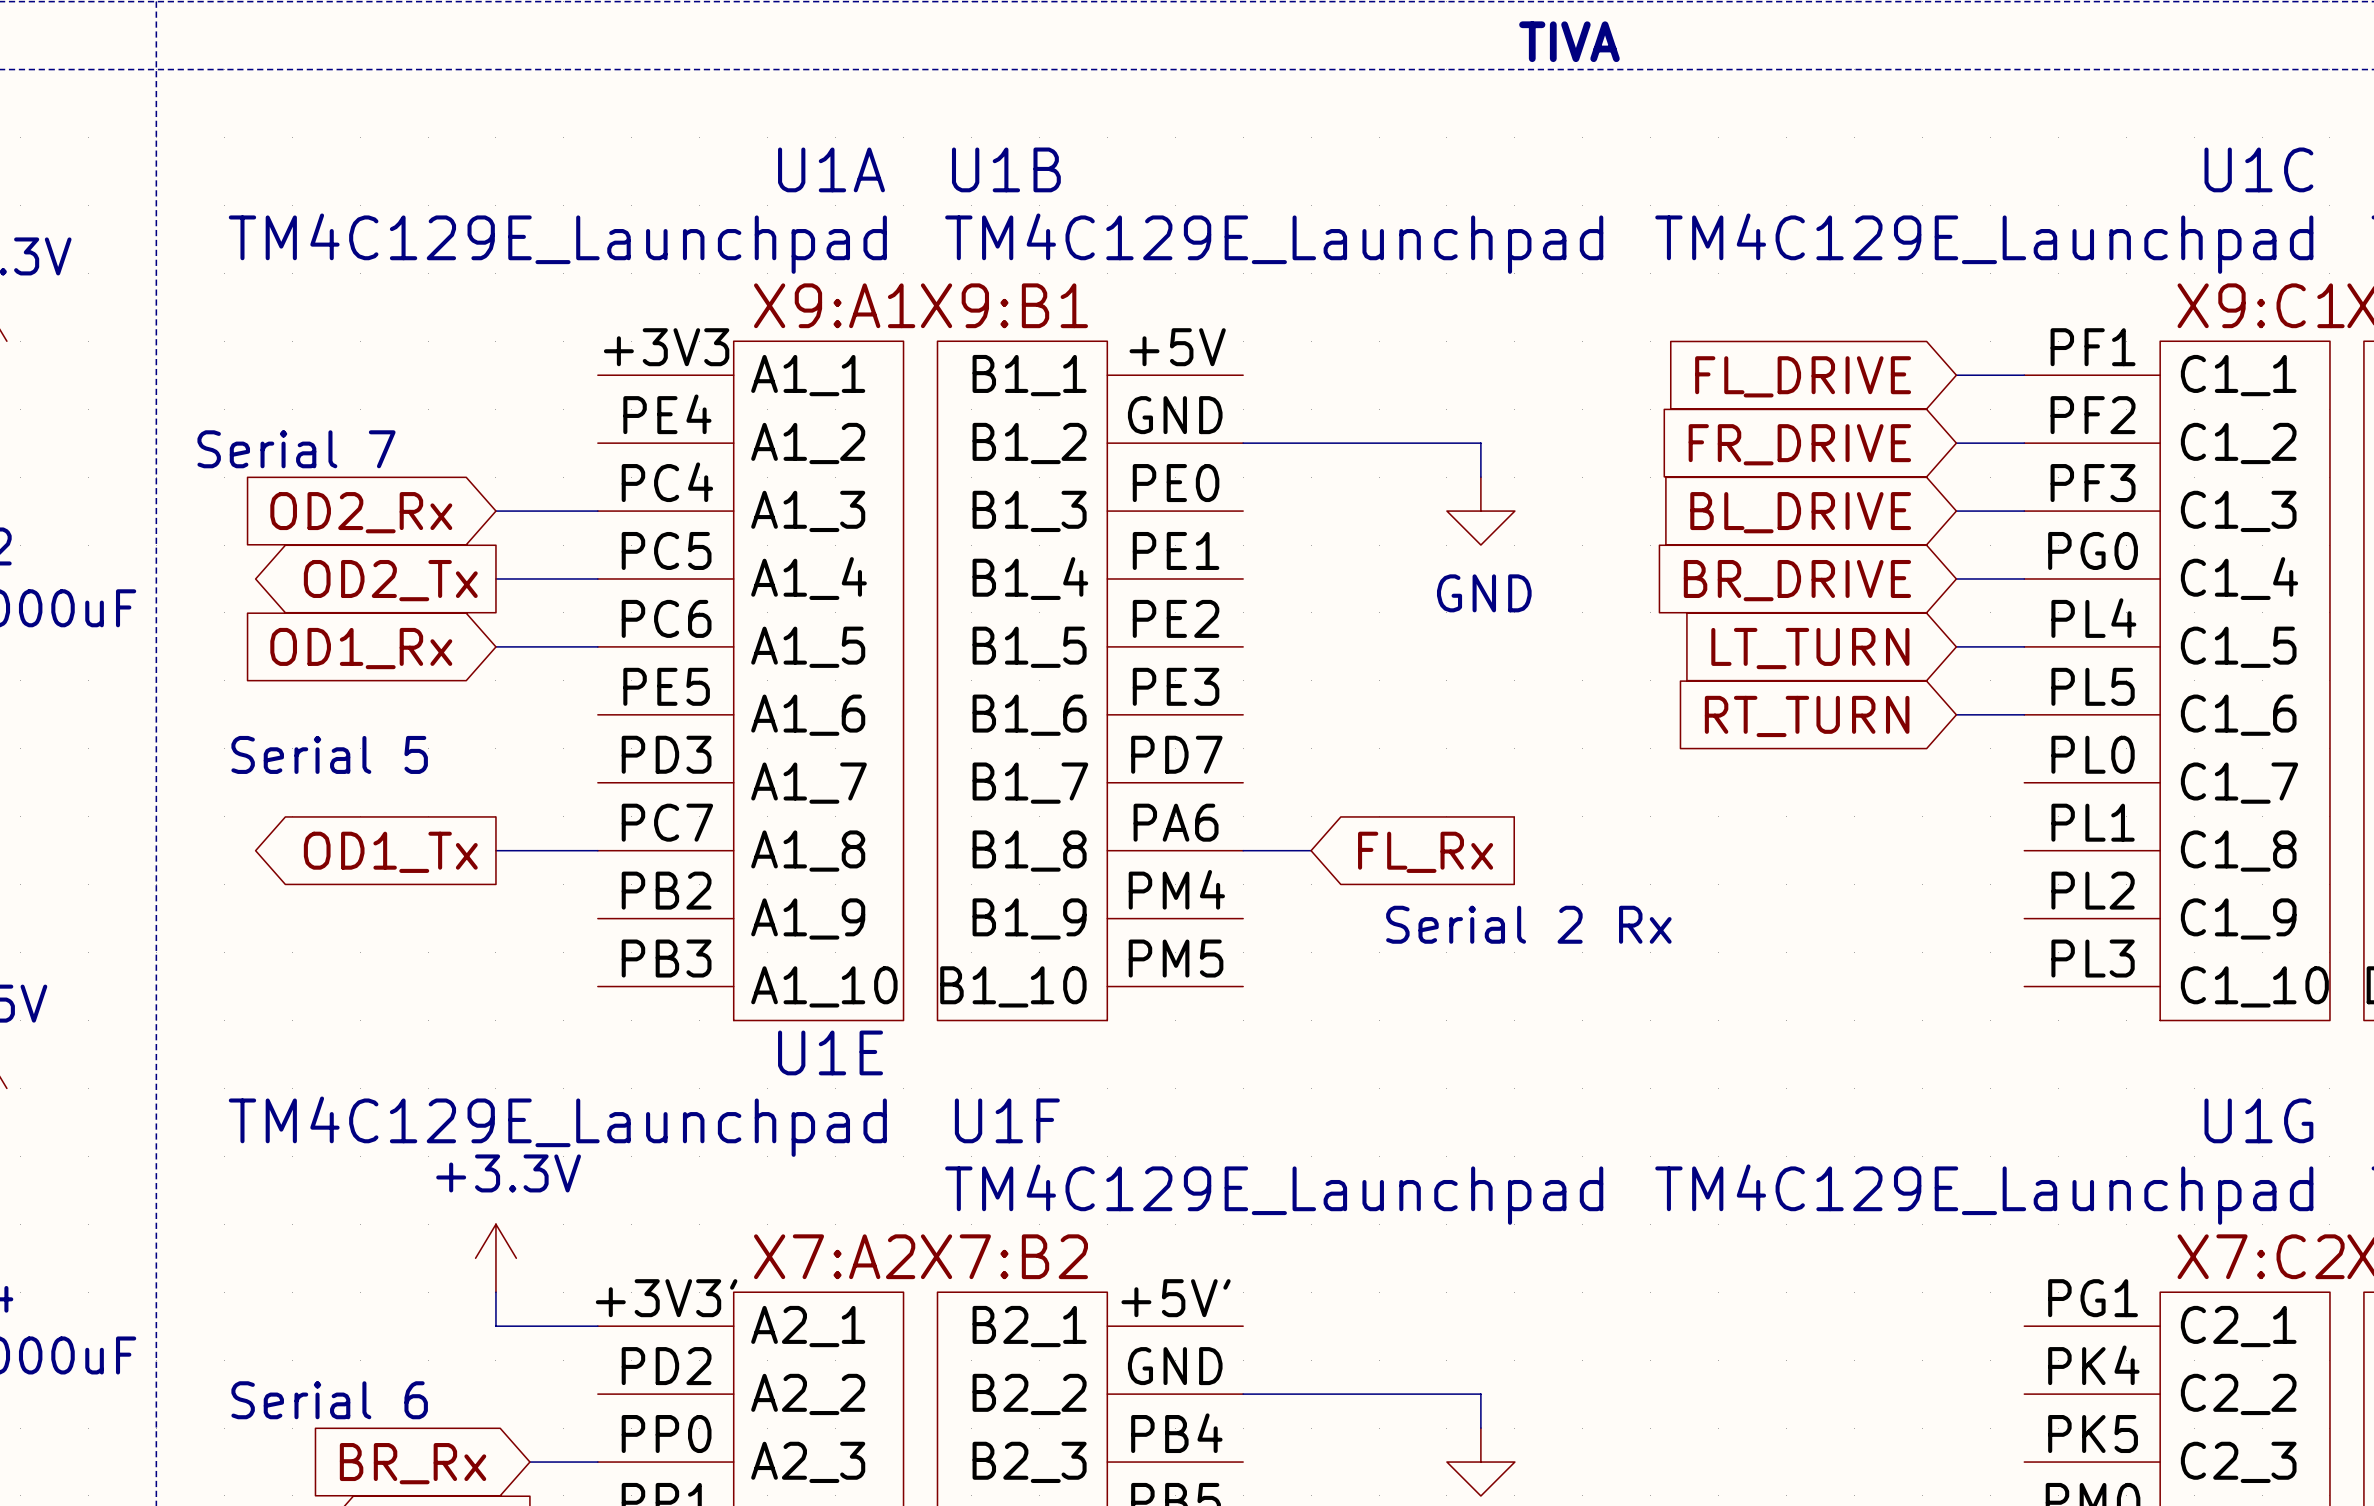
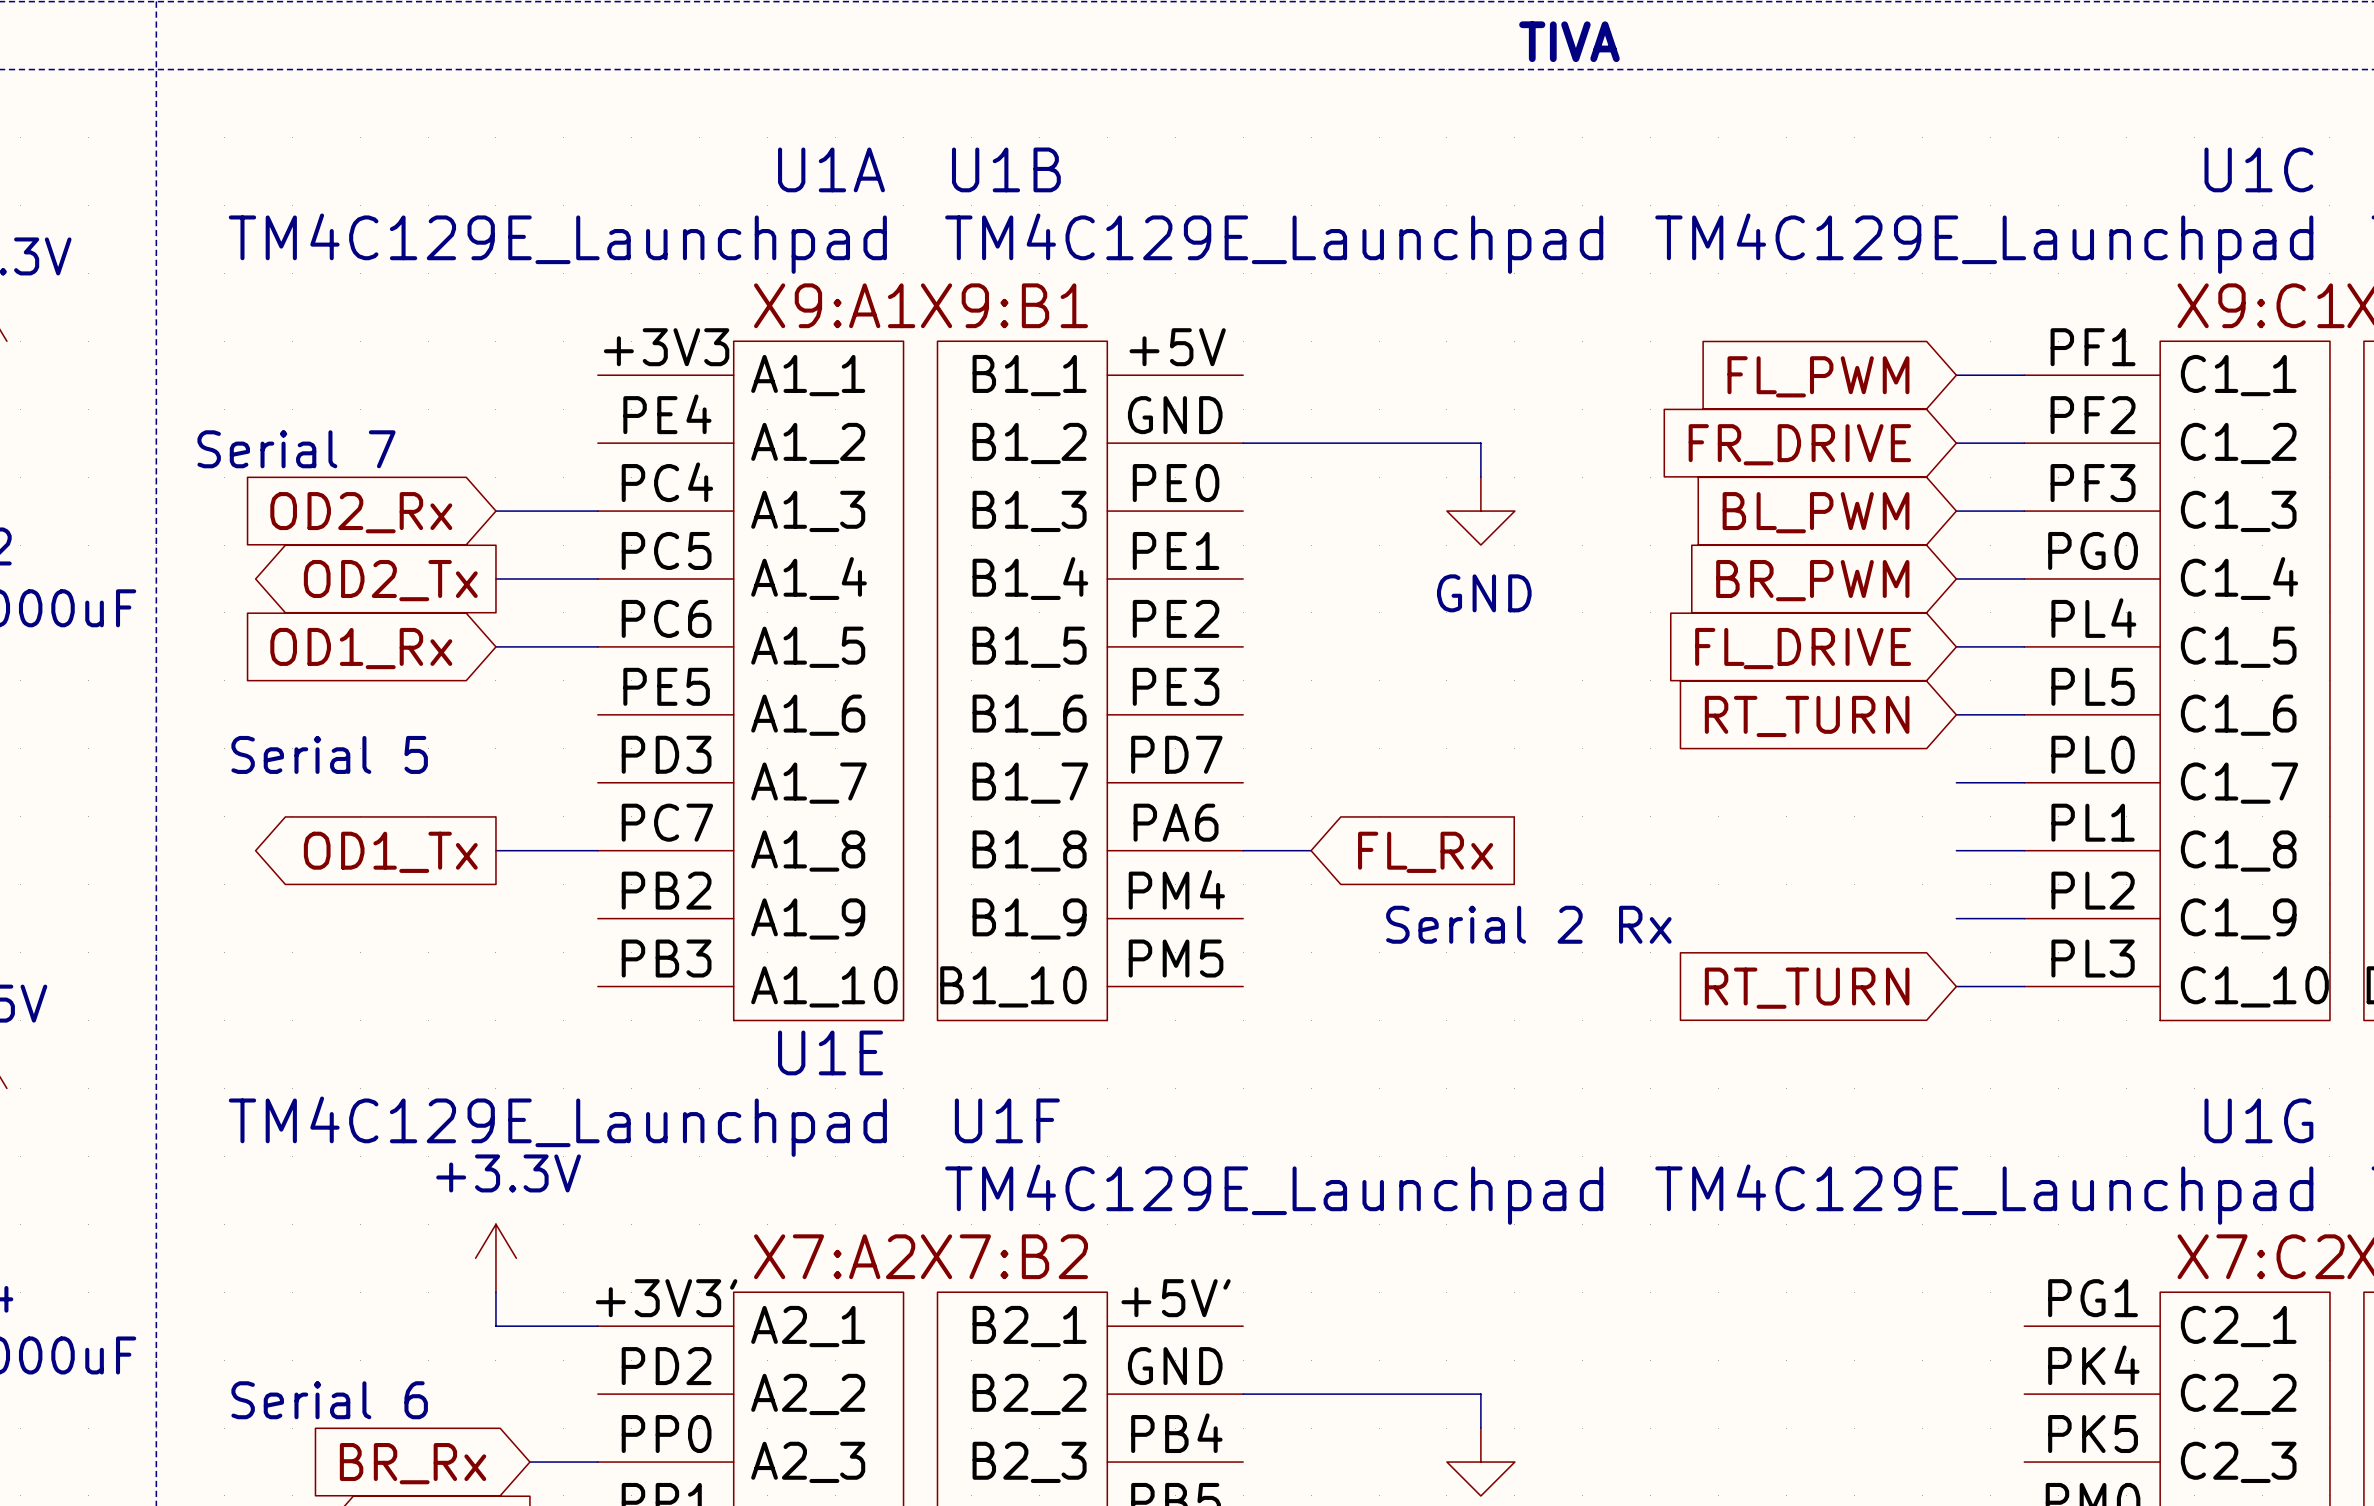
global label: FL_DRIVE (1803, 376) -> FL_PWM (1818, 376)
global label: BL_DRIVE (1800, 512) -> BL_PWM (1816, 512)
global label: BR_DRIVE (1797, 580) -> BR_PWM (1812, 580)
global label: LT_TURN (1810, 648) -> FL_DRIVE (1803, 648)
wire: none -> (1956, 782) (2024, 782)
wire: none -> (1956, 850) (2024, 850)
wire: none -> (1956, 918) (2024, 918)
wire: none -> (1956, 986) (2024, 986)
global label: none -> RT_TURN (1807, 988)

